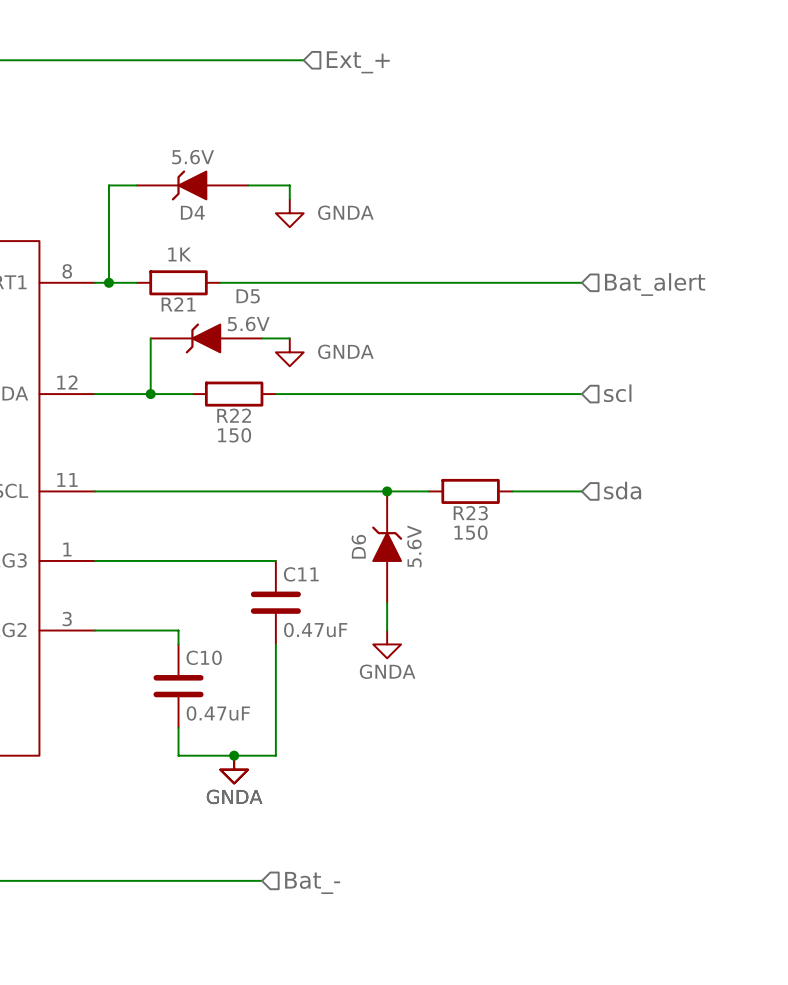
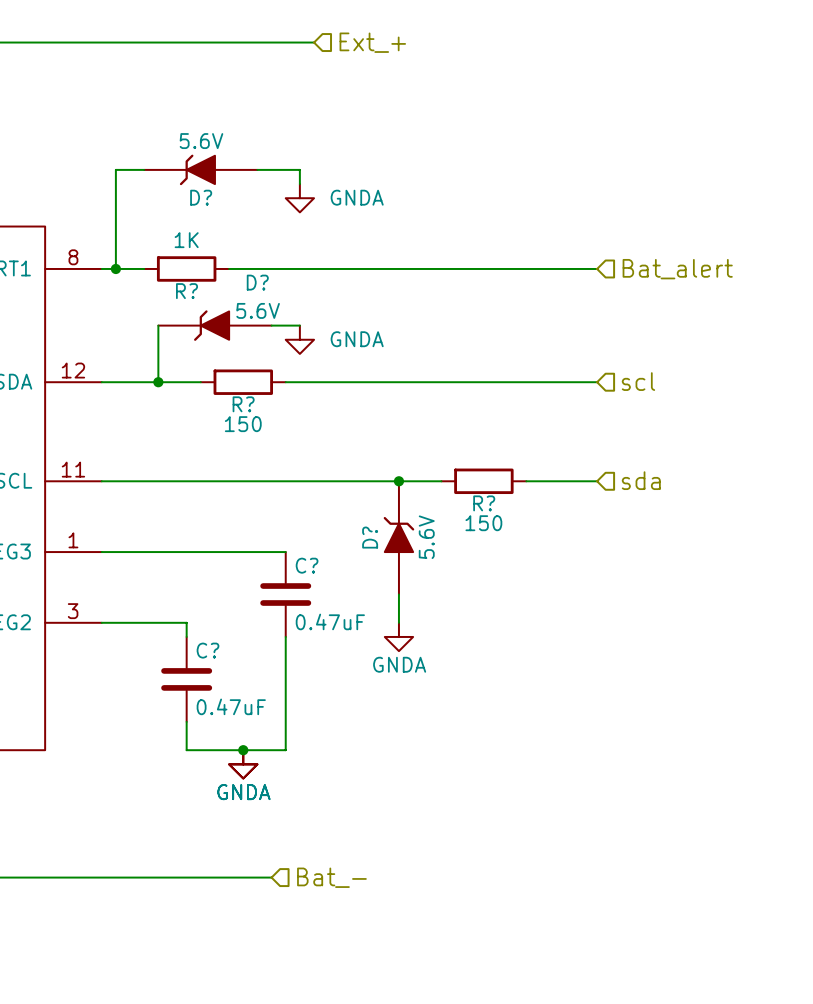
D4 name: D4 (192, 212) -> D? (201, 197)
D5 name: D5 (248, 296) -> D? (257, 282)
R21 name: R21 (178, 304) -> R? (187, 291)
R22 name: R22 (234, 415) -> R? (243, 404)
R23 name: R23 (470, 513) -> R? (484, 503)
D6 name: D6 (358, 546) -> D? (370, 537)
C11 name: C11 (301, 574) -> C? (307, 565)
C10 name: C10 (204, 657) -> C? (208, 650)

